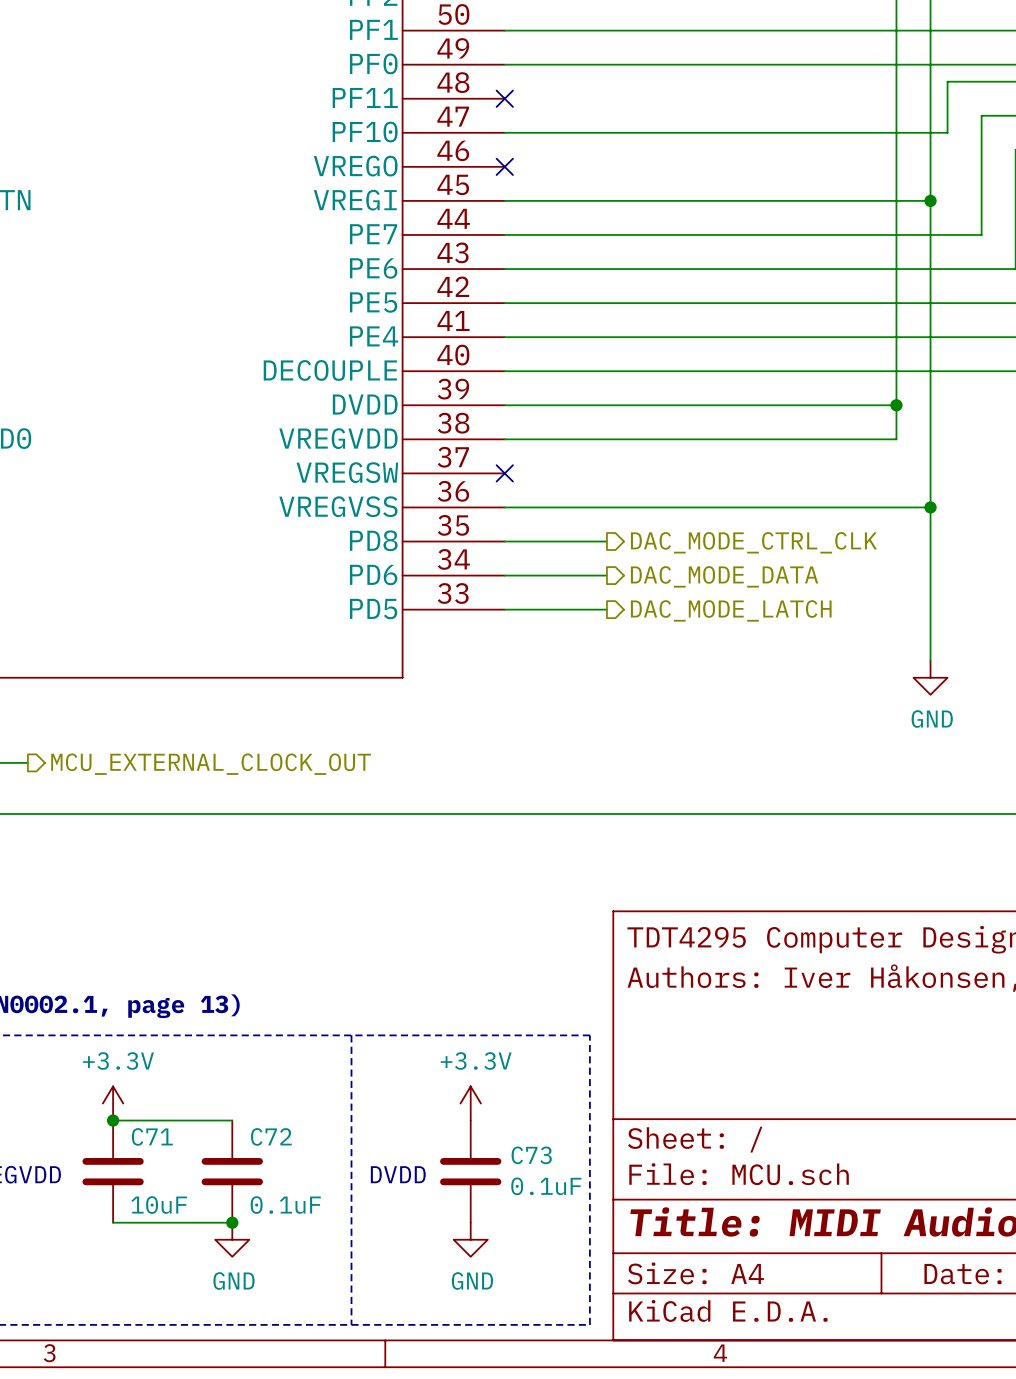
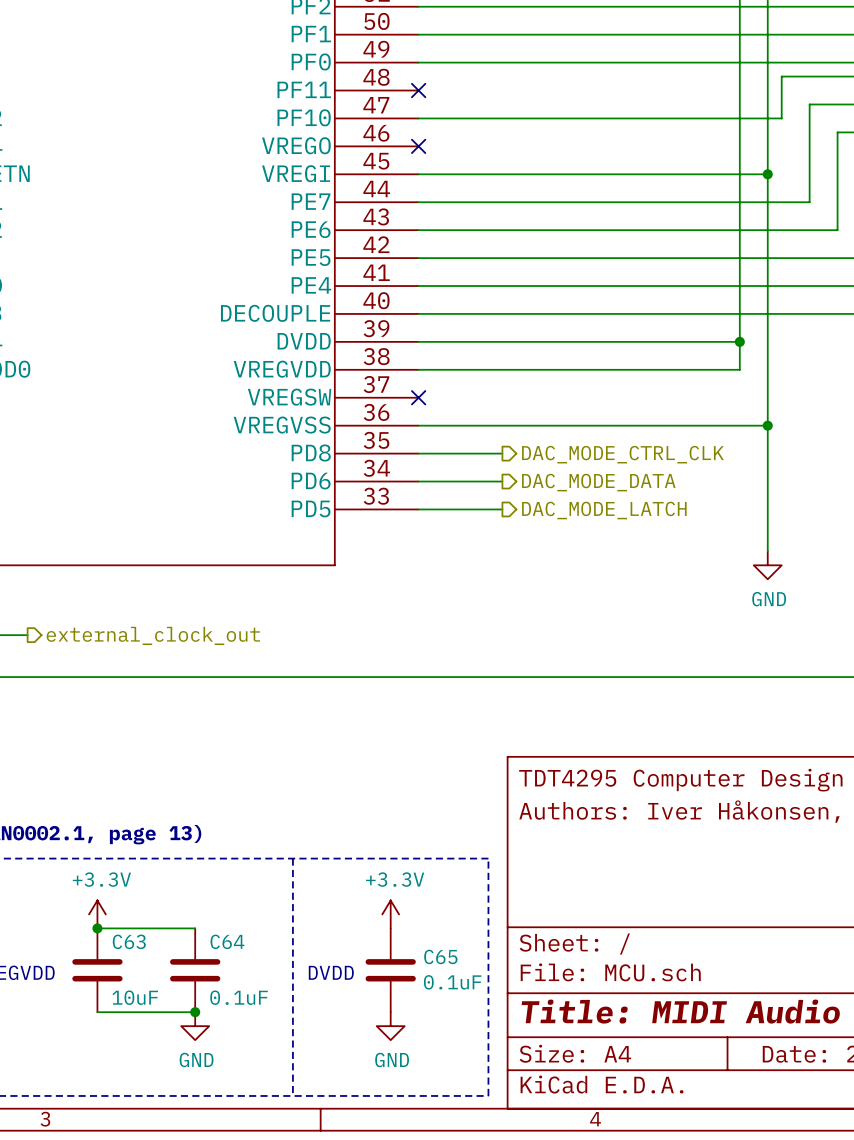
hierarchical label: MCU_EXTERNAL_CLOCK_OUT (211, 764) -> external_clock_out (153, 635)
C71 name: C71 (152, 1136) -> C63 (129, 941)
C72 name: C72 (271, 1136) -> C64 (227, 941)
C73 name: C73 (531, 1155) -> C65 (440, 956)

